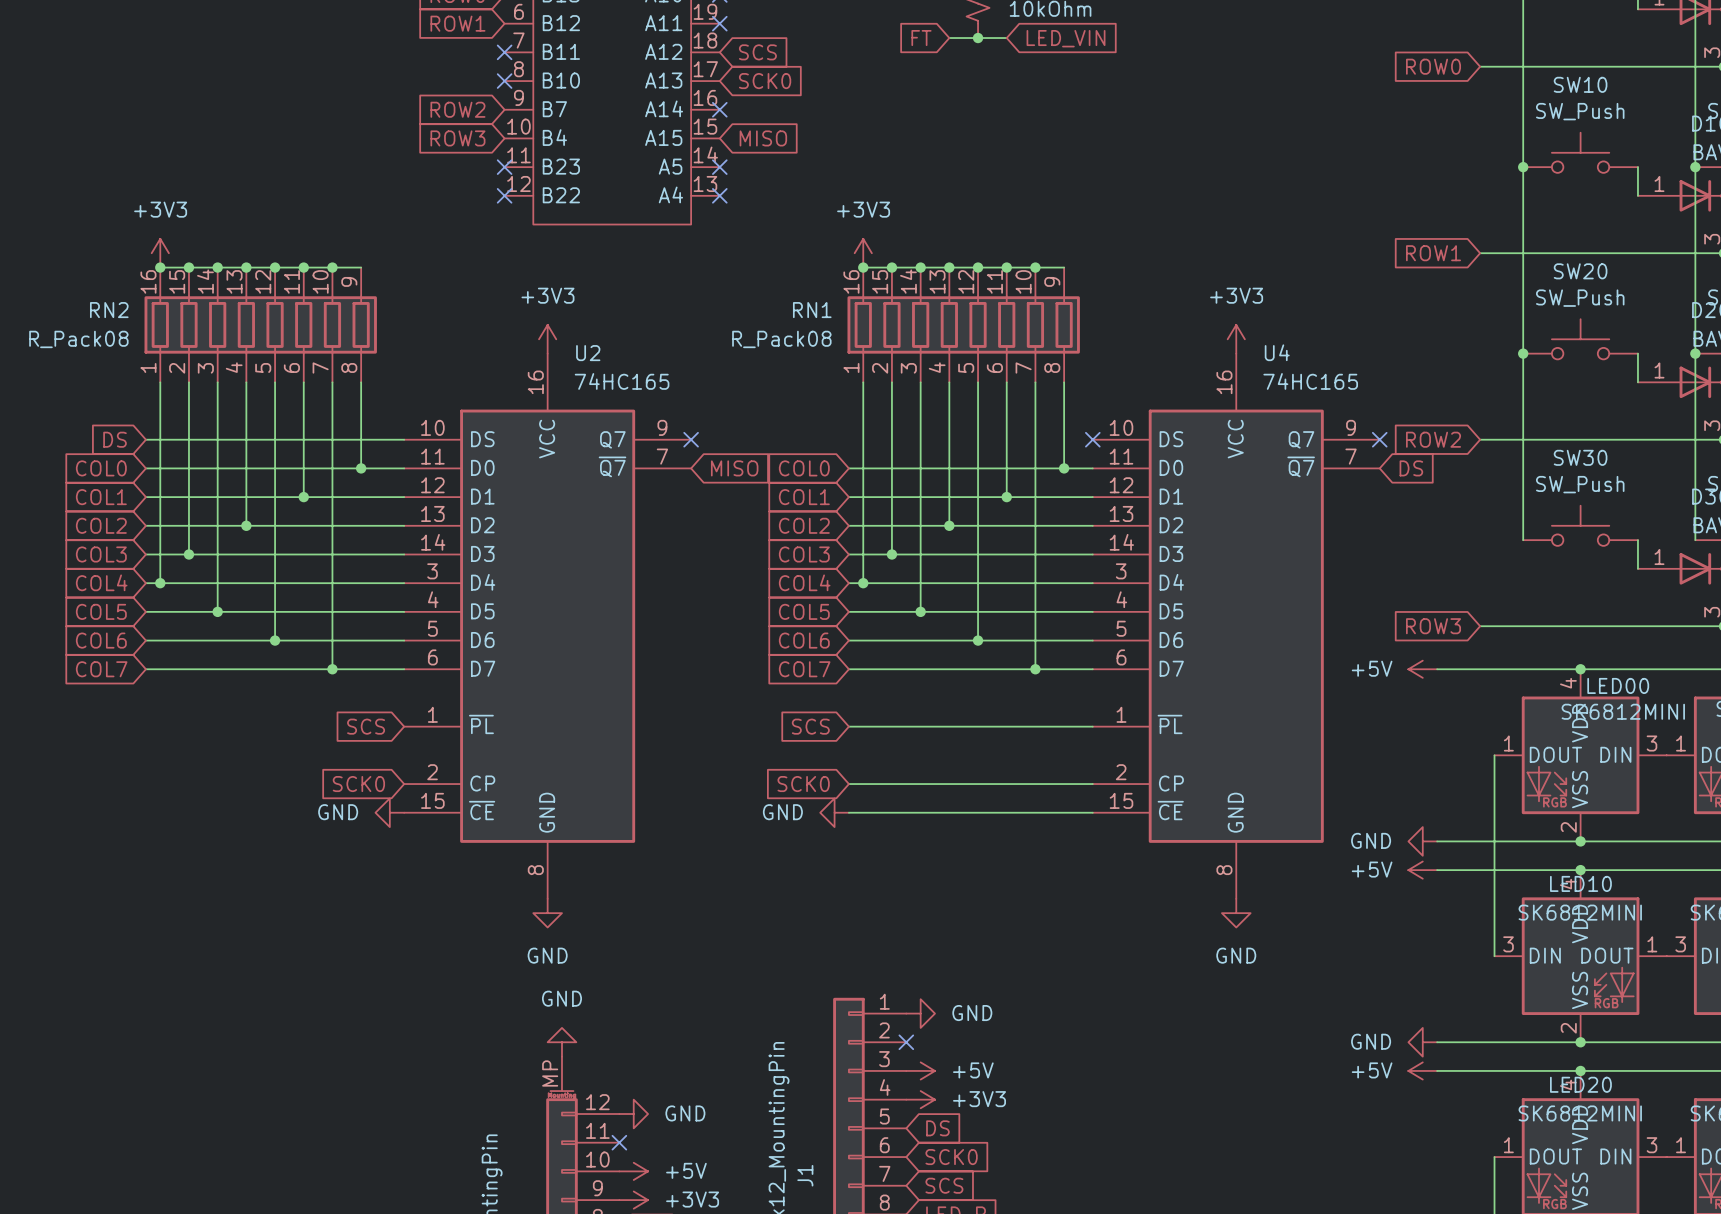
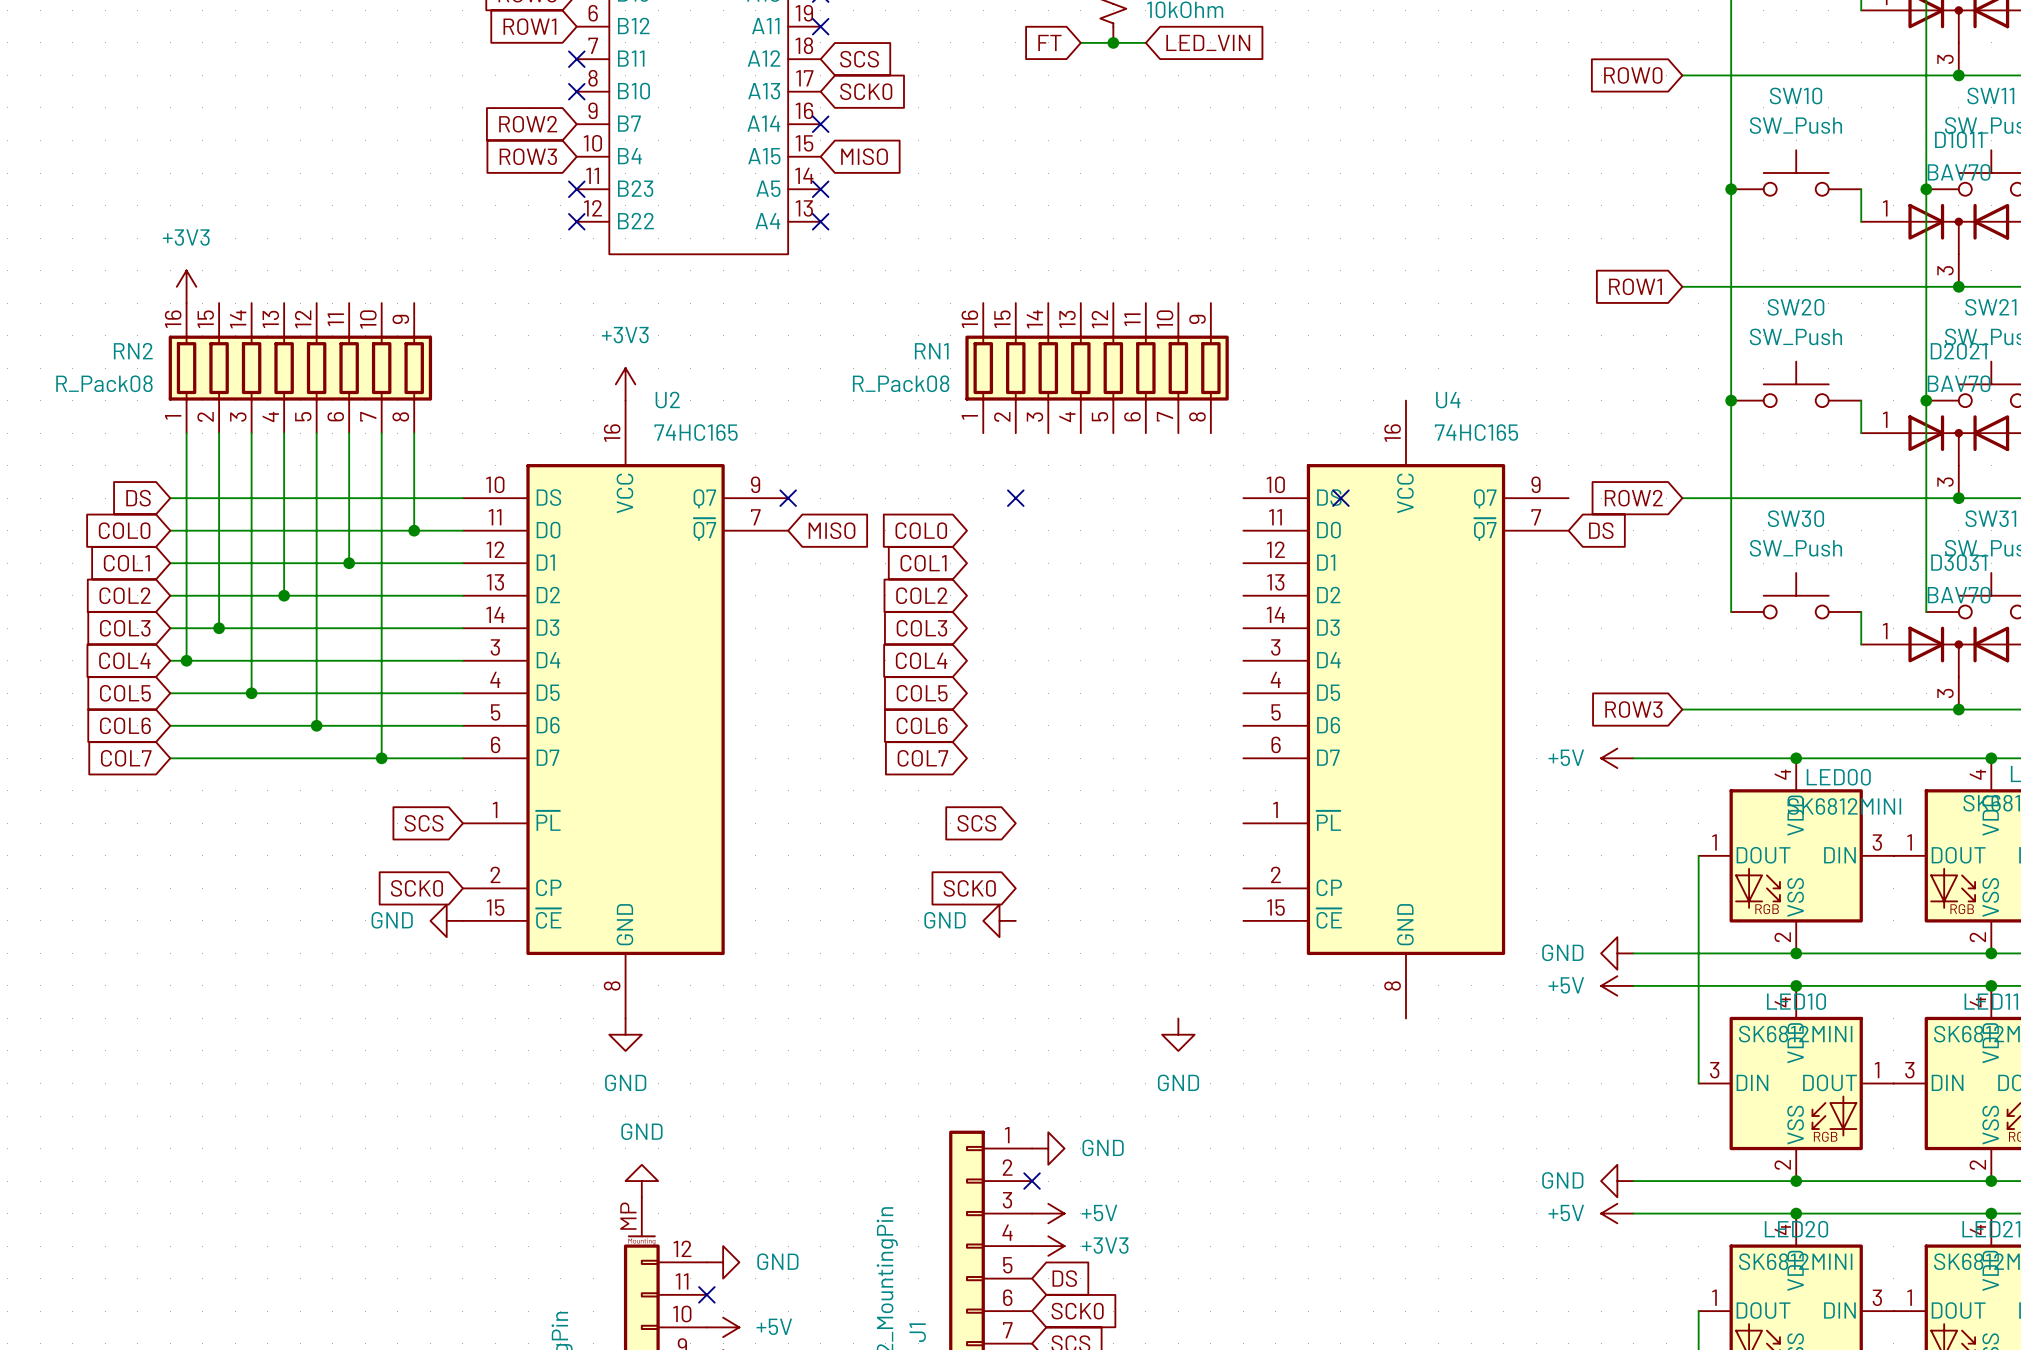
power symbol: +3V3 (863, 253) -> none
wire: (160, 267) (361, 267) -> none
junction: (160, 267) -> none
junction: (188, 267) -> none
junction: (217, 267) -> none
junction: (246, 267) -> none
junction: (275, 267) -> none
junction: (303, 267) -> none
junction: (332, 267) -> none
wire: (863, 267) (1064, 267) -> none
junction: (863, 267) -> none
junction: (891, 267) -> none
junction: (920, 267) -> none
junction: (949, 267) -> none
junction: (978, 267) -> none
junction: (1006, 267) -> none
junction: (1035, 267) -> none
power symbol: +3V3 (1236, 339) -> none
wire: (863, 382) (863, 583) -> none
wire: (891, 382) (891, 554) -> none
wire: (920, 382) (920, 611) -> none
wire: (949, 382) (949, 525) -> none
wire: (978, 382) (978, 640) -> none
wire: (1006, 382) (1006, 497) -> none
wire: (1035, 382) (1035, 669) -> none
wire: (1064, 382) (1064, 468) -> none
no-connect mark: none -> (1015, 498)
no-connect mark: (1092, 439) -> none
no-connect mark: none -> (1340, 498)
no-connect mark: (1379, 439) -> none
wire: (848, 468) (1092, 468) -> none
junction: (1064, 468) -> none
wire: (848, 497) (1092, 497) -> none
junction: (1006, 497) -> none
wire: (848, 525) (1092, 525) -> none
junction: (949, 525) -> none
wire: (848, 554) (1092, 554) -> none
junction: (891, 554) -> none
wire: (848, 583) (1092, 583) -> none
junction: (863, 583) -> none
wire: (848, 611) (1092, 611) -> none
junction: (920, 611) -> none
wire: (848, 640) (1092, 640) -> none
junction: (978, 640) -> none
wire: (848, 669) (1092, 669) -> none
junction: (1035, 669) -> none
global label position: SCS (810, 726) -> SCS (976, 823)
wire: (848, 726) (1092, 726) -> none
global label position: SCK0 (803, 784) -> SCK0 (969, 888)
wire: (848, 784) (1092, 784) -> none
power symbol position: GND (834, 812) -> GND (999, 920)
wire: (848, 812) (1092, 812) -> none
power symbol: none -> GND (1178, 1034)
power symbol: GND (1236, 913) -> none

